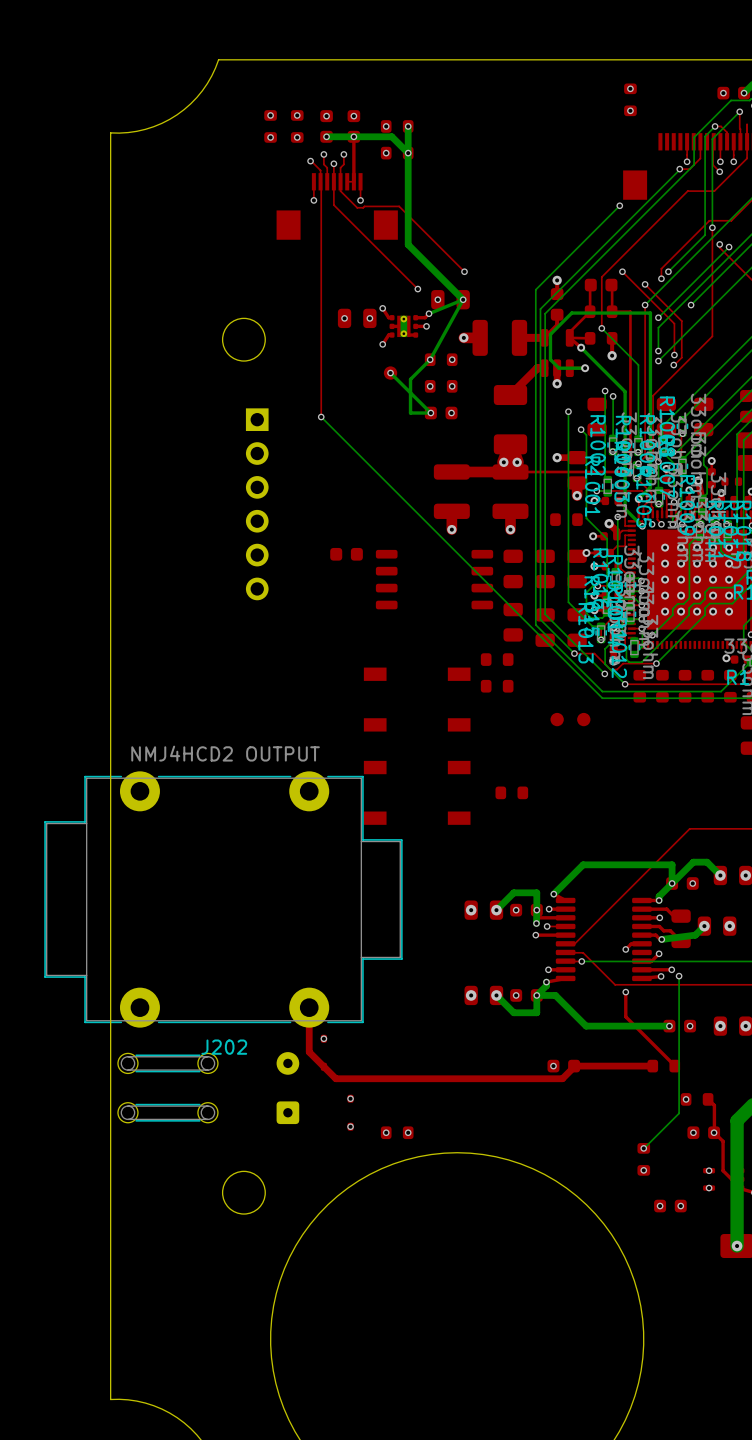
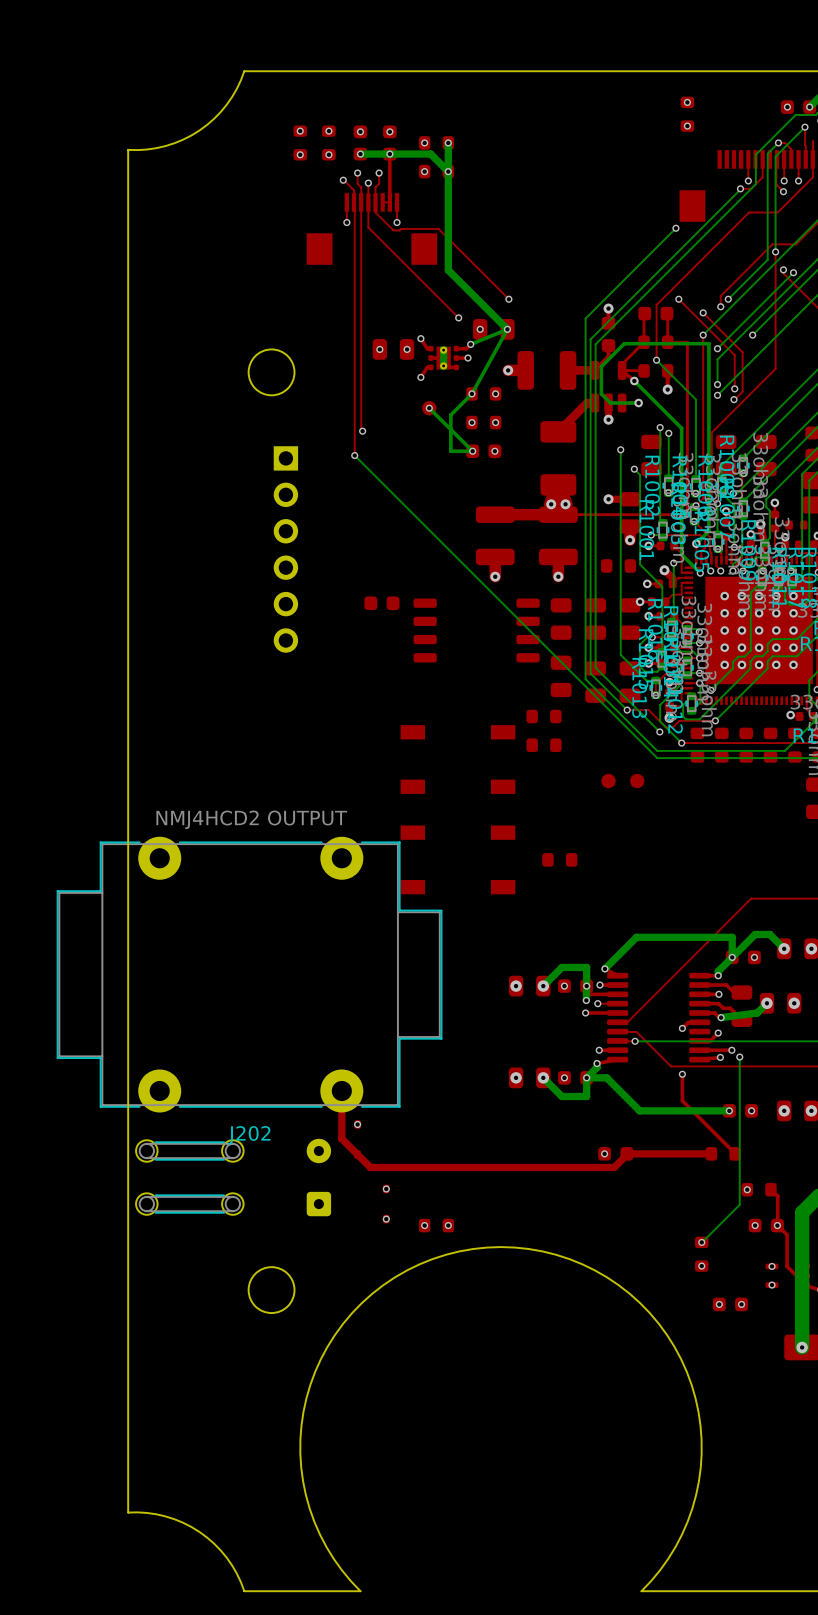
top track: none -> (361, 202) (362, 431)
via: none -> (362, 431)

